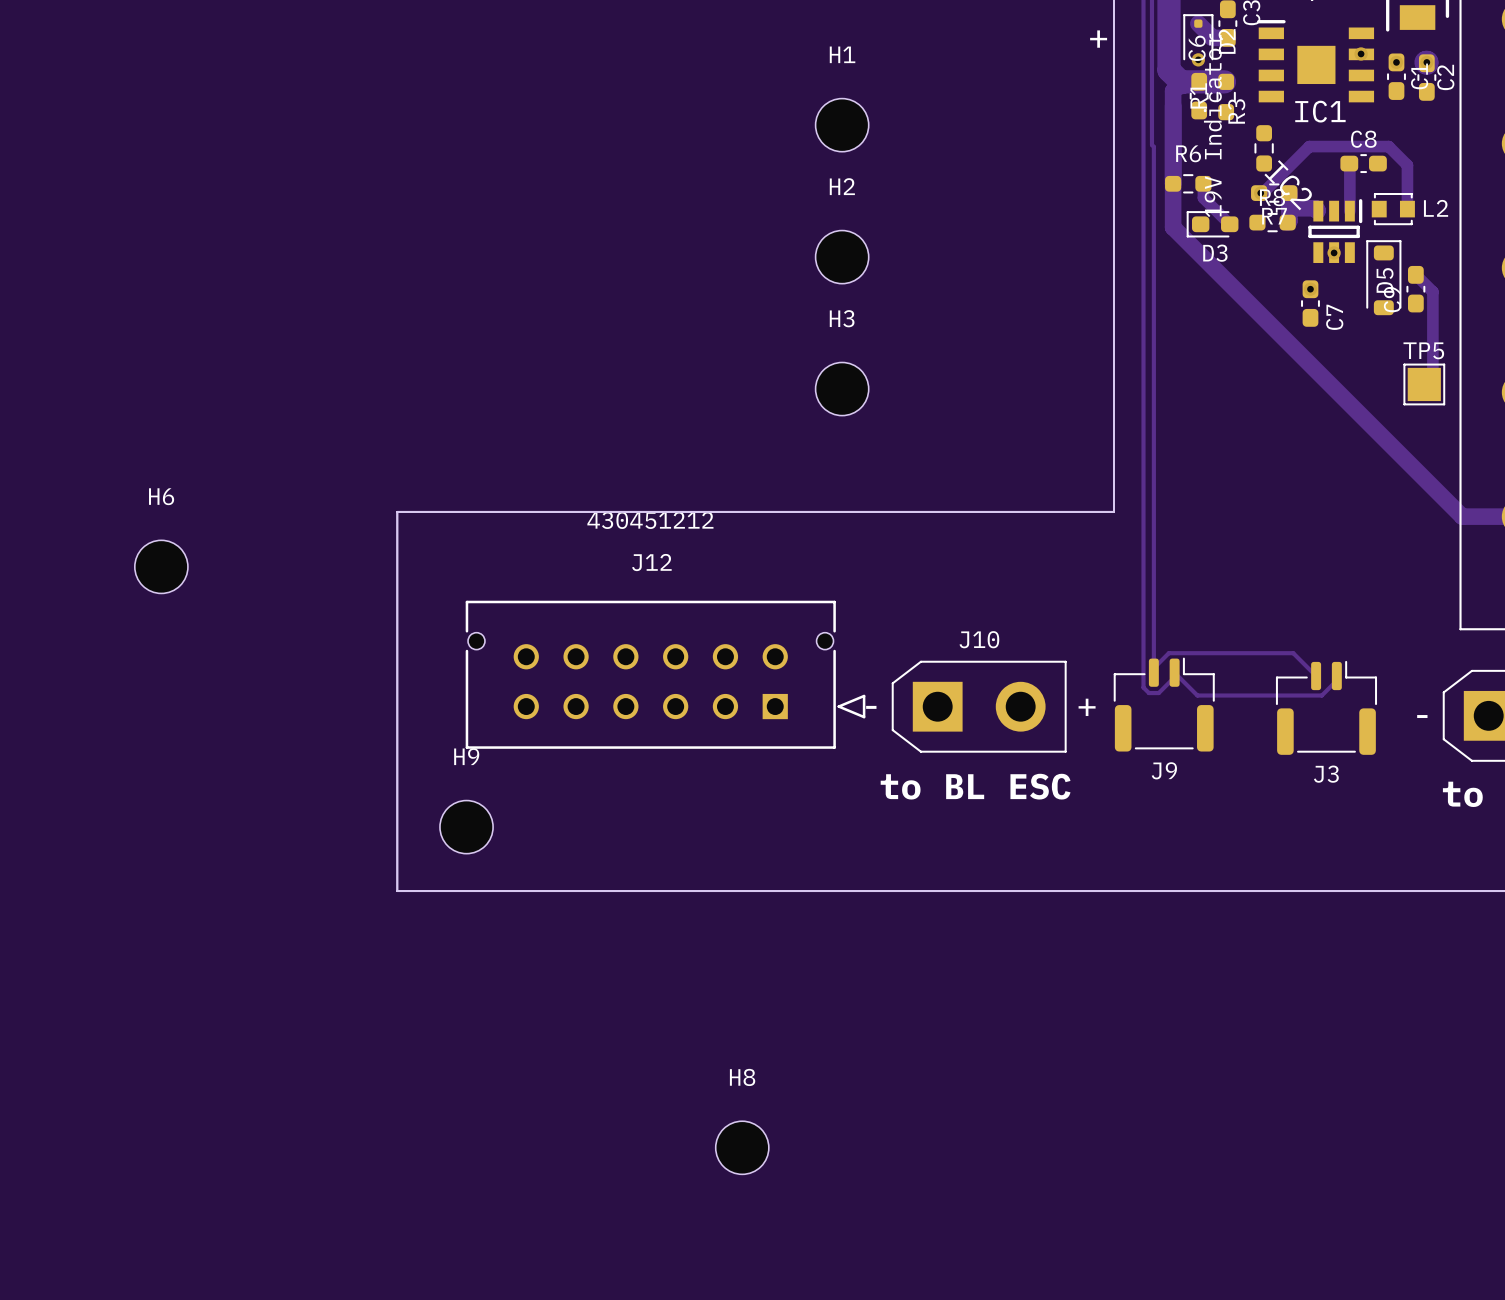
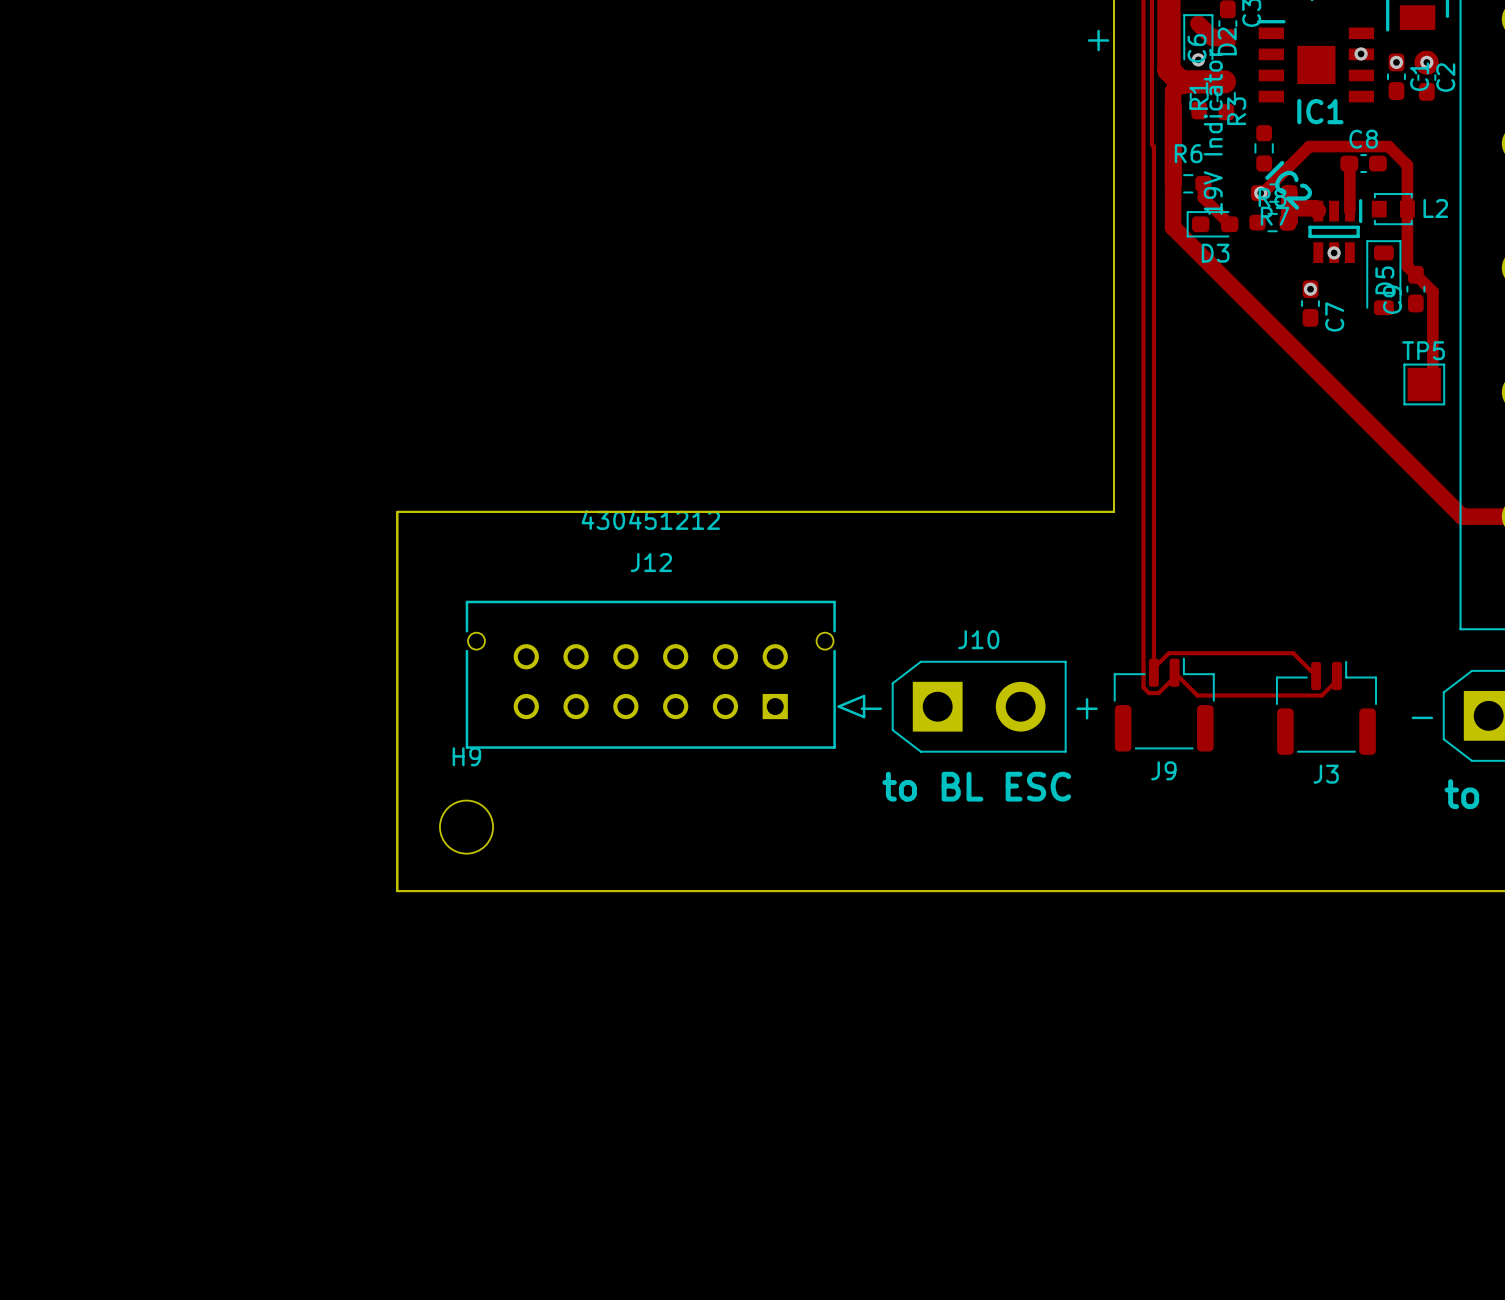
H1: (842, 125) -> none
track: none -> (1407, 209) (1407, 266) (1415, 274)
H2: (842, 257) -> none
H3: (842, 389) -> none
H6: (161, 566) -> none
H8: (742, 1147) -> none

